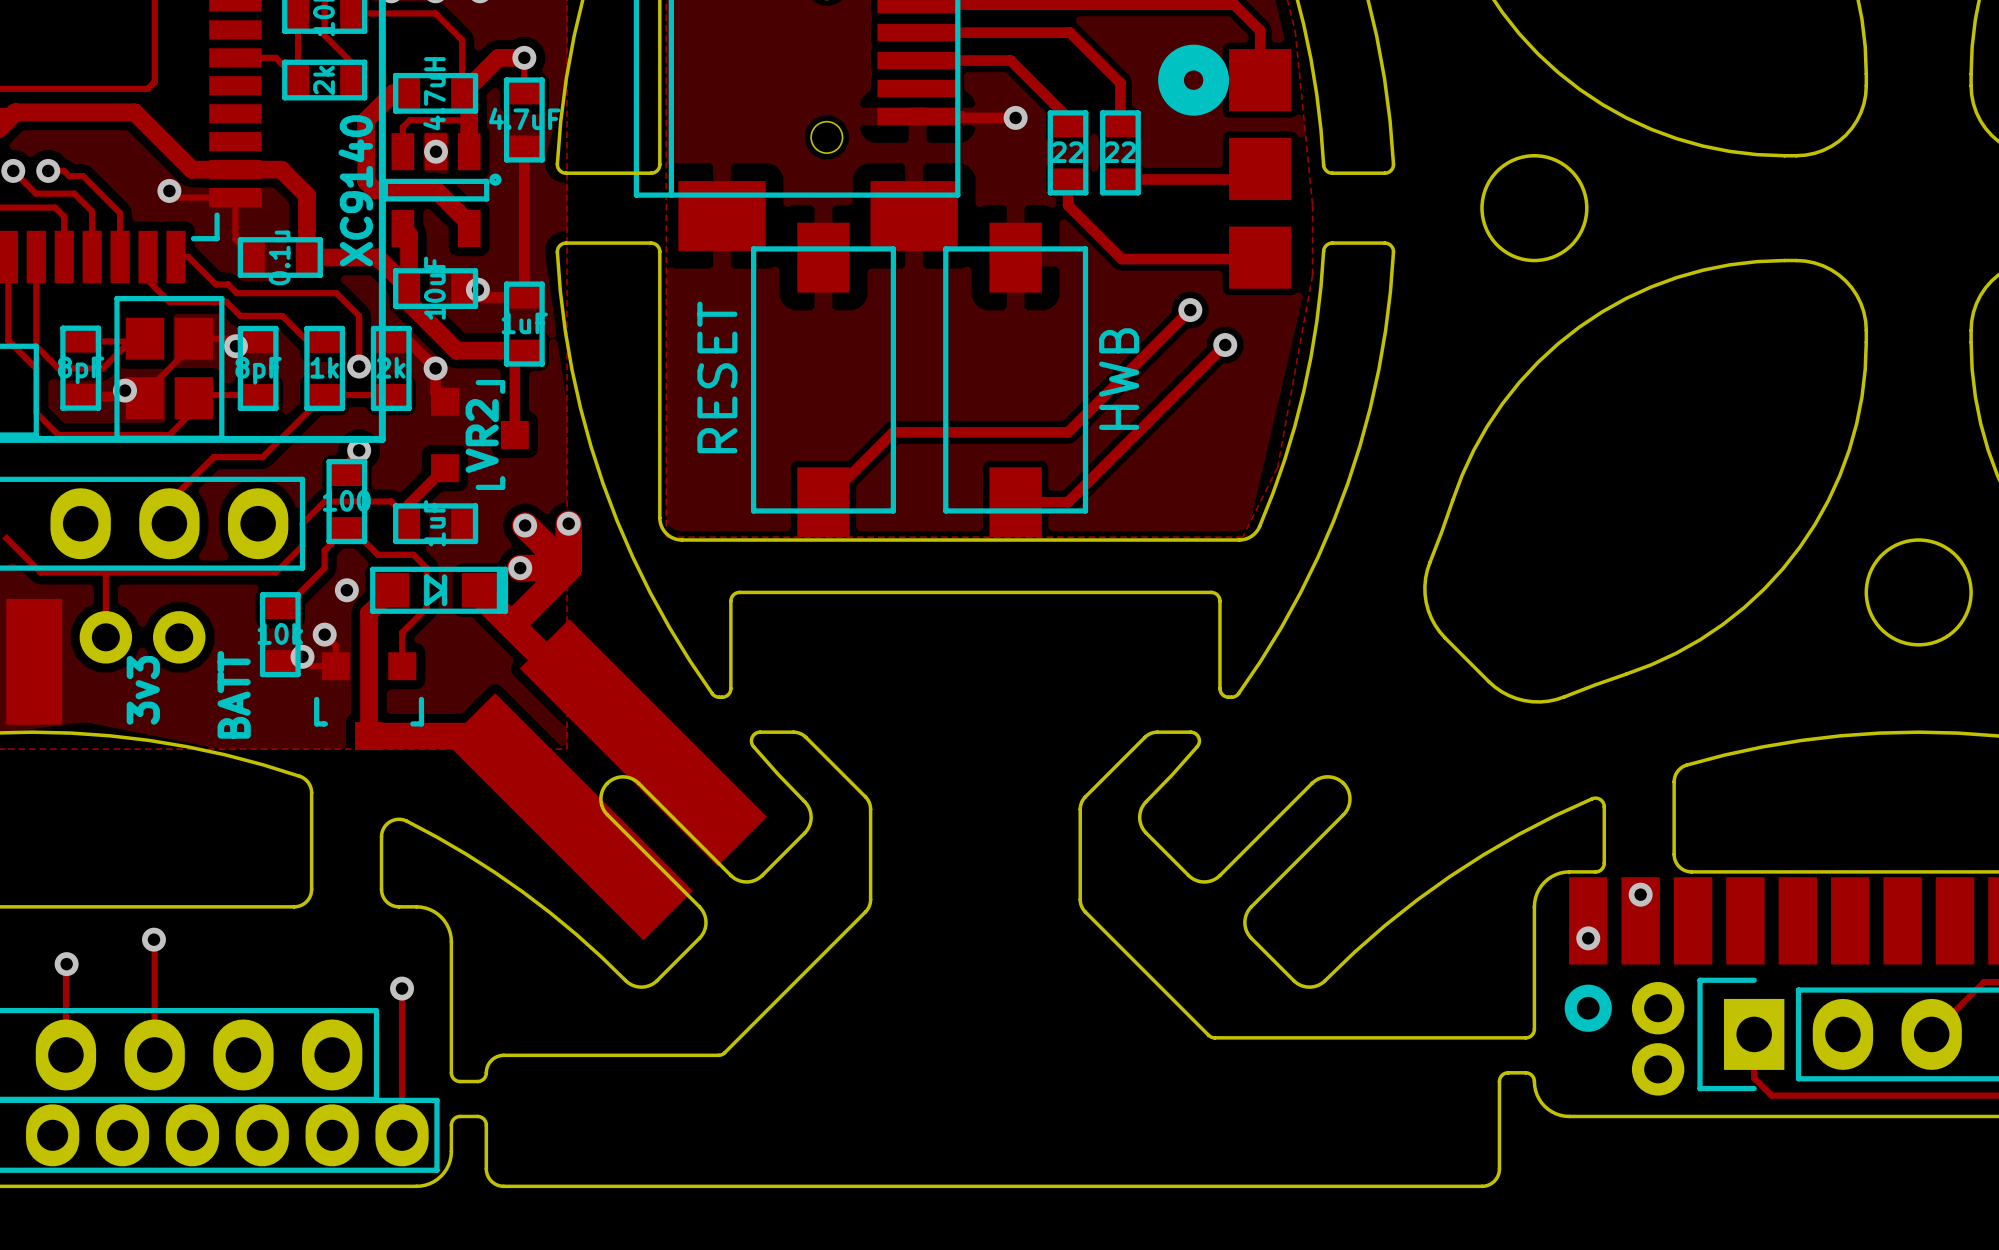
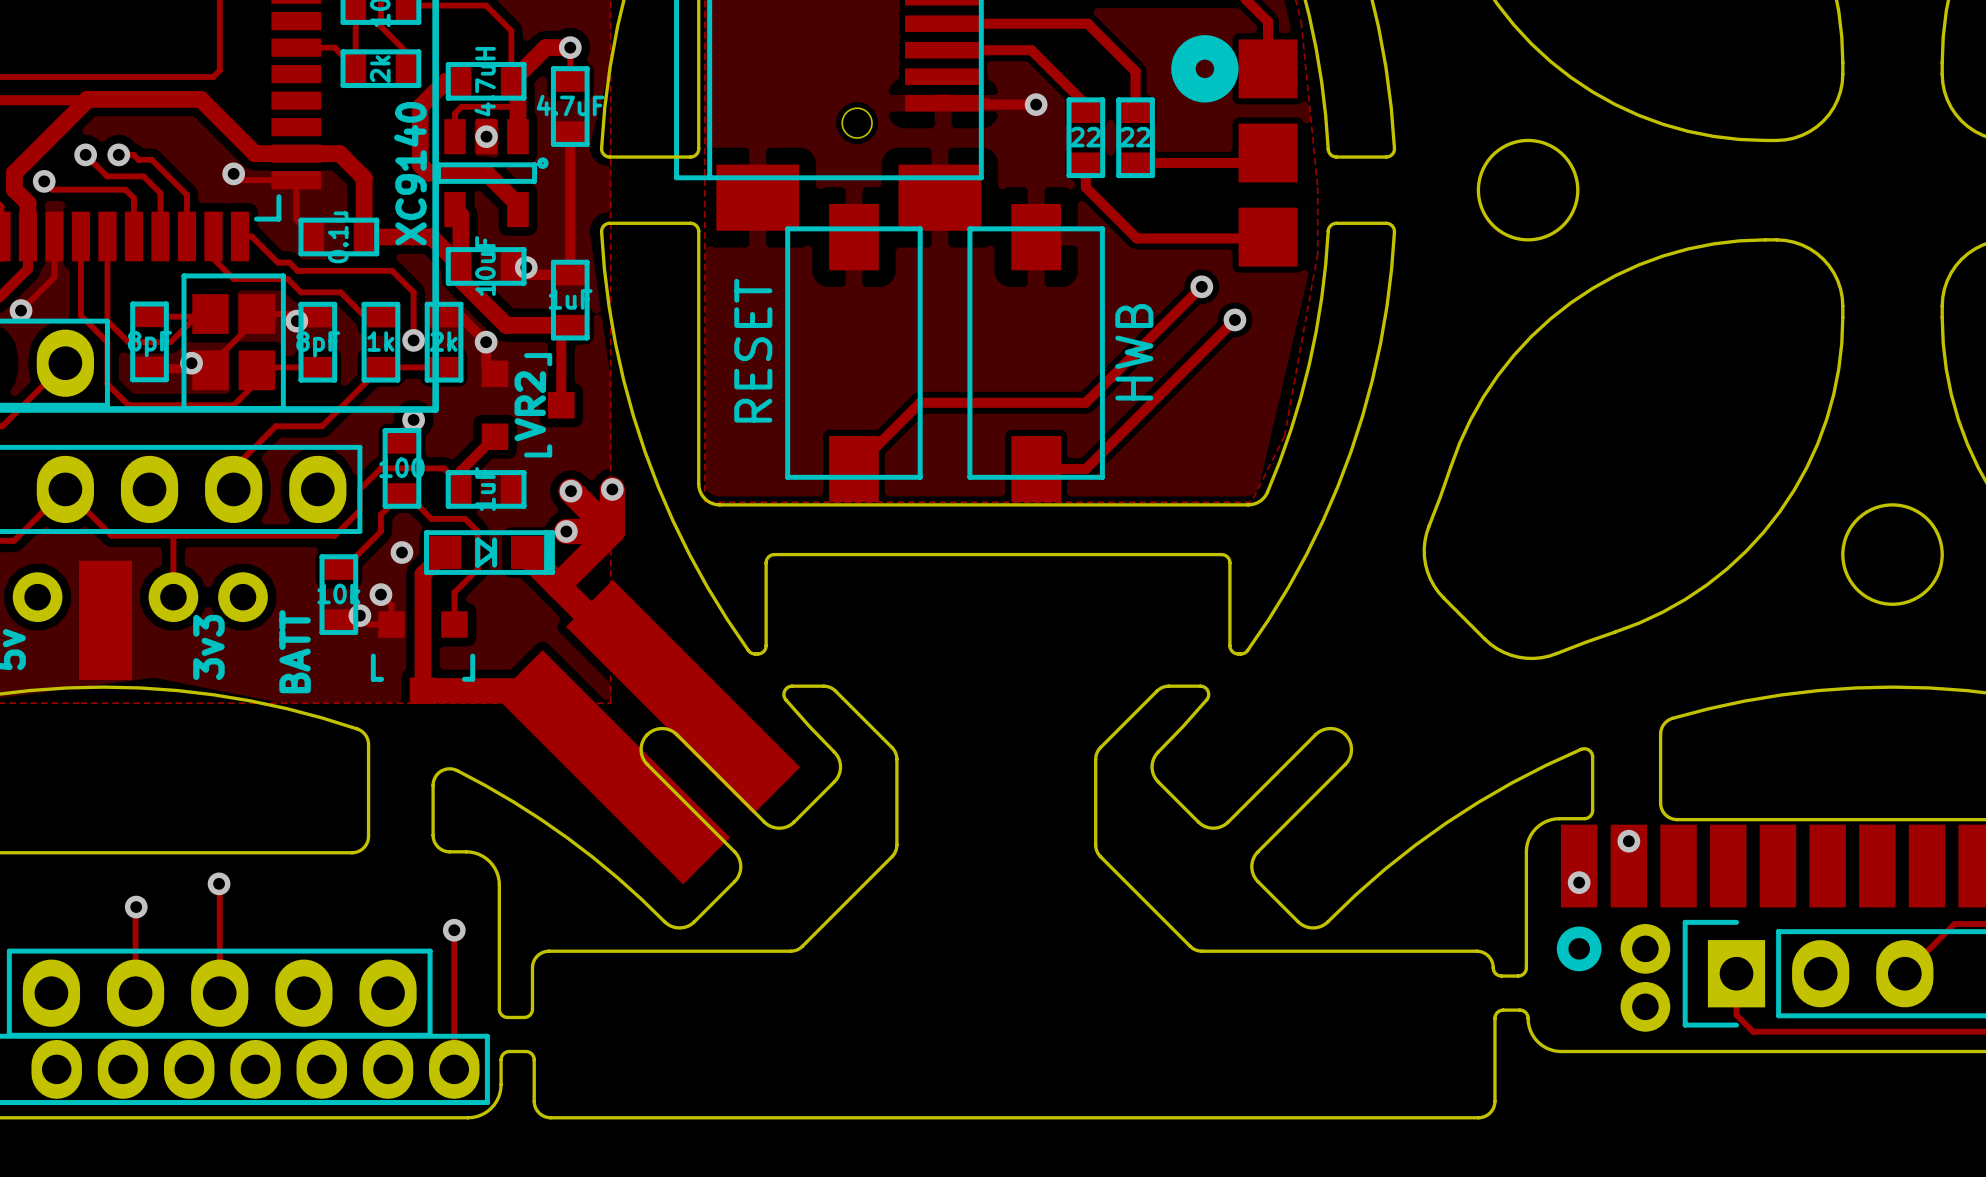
board edge: none -> (1168, 686) (1202, 686) (1207, 690) (1208, 696) (1156, 753) (1152, 762) (1152, 771) (1158, 781) (1198, 822) (1207, 827) (1216, 828) (1226, 823) (1319, 731) (1327, 728) (1335, 729) (1343, 732) (1348, 739) (1351, 752) (1347, 762) (1257, 851) (1252, 861) (1252, 872) (1256, 879) (1299, 923) (1310, 927) (1320, 926) (1326, 923) (1384, 869) (1446, 823) (1478, 802) (1546, 765) (1582, 749) (1589, 750) (1592, 757) (1592, 810) (1590, 815) (1585, 818) (1555, 818) (1546, 821) (1536, 828) (1527, 843) (1526, 967) (1524, 972) (1519, 975) (1498, 975) (1493, 970) (1489, 957) (1478, 951) (1201, 951) (1191, 947) (1100, 856) (1095, 847) (1096, 752) (1157, 691) (1168, 686)
board edge: (793, 732) (805, 737) (869, 802) (870, 899) (865, 911) (721, 1054) (501, 1055) (489, 1062) (485, 1076) (481, 1080) (460, 1081) (453, 1078) (451, 1072) (450, 932) (444, 920) (433, 911) (421, 907) (394, 906) (383, 898) (381, 889) (381, 836) (386, 824) (393, 820) (404, 820) (466, 854) (549, 912) (627, 982) (636, 986) (646, 986) (657, 980) (701, 936) (705, 925) (705, 916) (699, 906) (605, 812) (600, 799) (603, 787) (609, 781) (617, 777) (625, 777) (634, 779) (733, 877) (740, 881) (752, 881) (762, 875) (804, 833) (810, 822) (810, 812) (806, 803) (751, 742) (752, 736) (758, 732) (793, 732) -> (792, 686) (784, 690) (785, 698) (835, 753) (840, 766) (835, 780) (787, 826) (776, 828) (766, 823) (672, 731) (662, 728) (654, 730) (647, 734) (642, 741) (641, 752) (645, 762) (734, 851) (740, 861) (740, 869) (736, 879) (694, 921) (684, 927) (674, 927) (666, 923) (592, 857) (513, 801) (455, 769) (444, 769) (437, 773) (433, 785) (433, 835) (435, 843) (445, 851) (470, 852) (482, 856) (492, 864) (498, 876) (499, 1009) (501, 1015) (506, 1017) (524, 1017) (530, 1014) (533, 963) (537, 956) (544, 951) (797, 949) (892, 856) (896, 844) (896, 759) (894, 751) (832, 688) (823, 686) (792, 686)
board edge: (1190, 732) (1198, 737) (1197, 745) (1144, 803) (1139, 817) (1144, 831) (1188, 875) (1195, 880) (1207, 881) (1217, 877) (1316, 779) (1324, 777) (1333, 777) (1343, 783) (1348, 790) (1349, 801) (1345, 812) (1251, 906) (1245, 916) (1245, 925) (1249, 936) (1293, 980) (1304, 986) (1314, 986) (1323, 982) (1384, 925) (1449, 876) (1483, 854) (1519, 834) (1592, 798) (1599, 799) (1604, 805) (1604, 863) (1602, 868) (1596, 871) (1564, 872) (1555, 874) (1544, 882) (1535, 897) (1534, 1029) (1530, 1036) (1214, 1037) -> none
board edge: (1190, 732) (1157, 732) (1148, 734) (1082, 800) (1080, 809) (1080, 901) (1085, 911) (1208, 1035) (1214, 1037) -> none

